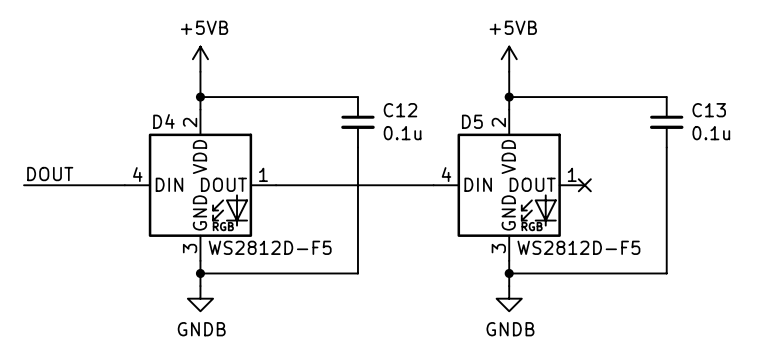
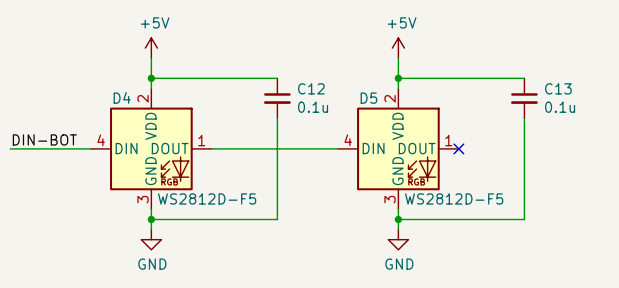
power symbol: +5VB (200, 59) -> +5V (151, 48)
power symbol: +5VB (509, 59) -> +5V (398, 48)
label: DOUT (50, 174) -> DIN-BOT (44, 139)
power symbol: GNDB (200, 298) -> GND (151, 239)
power symbol: GNDB (509, 298) -> GND (398, 239)

